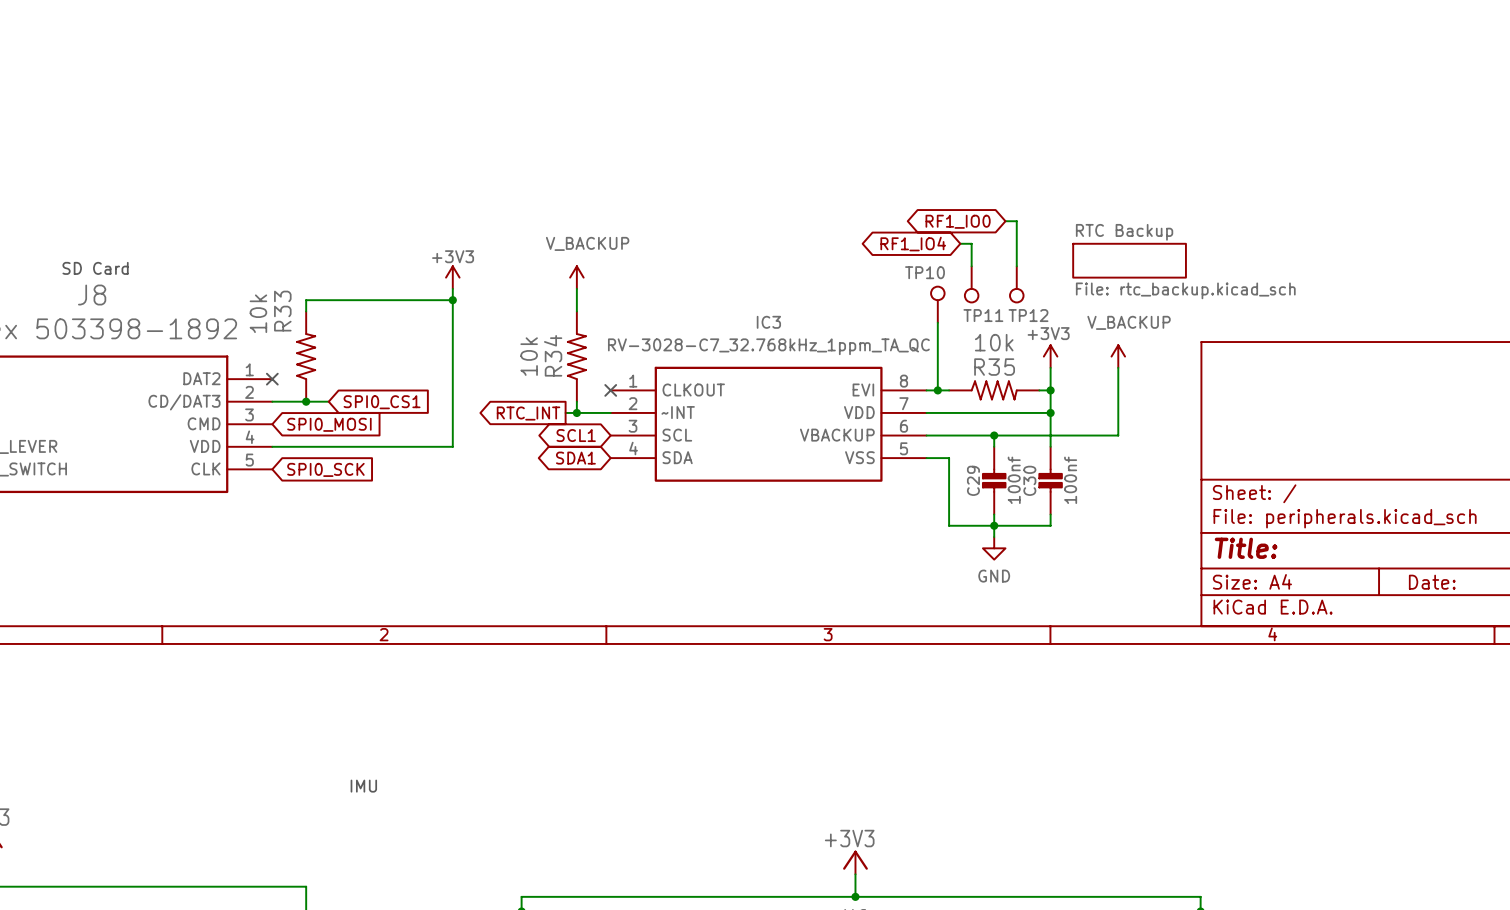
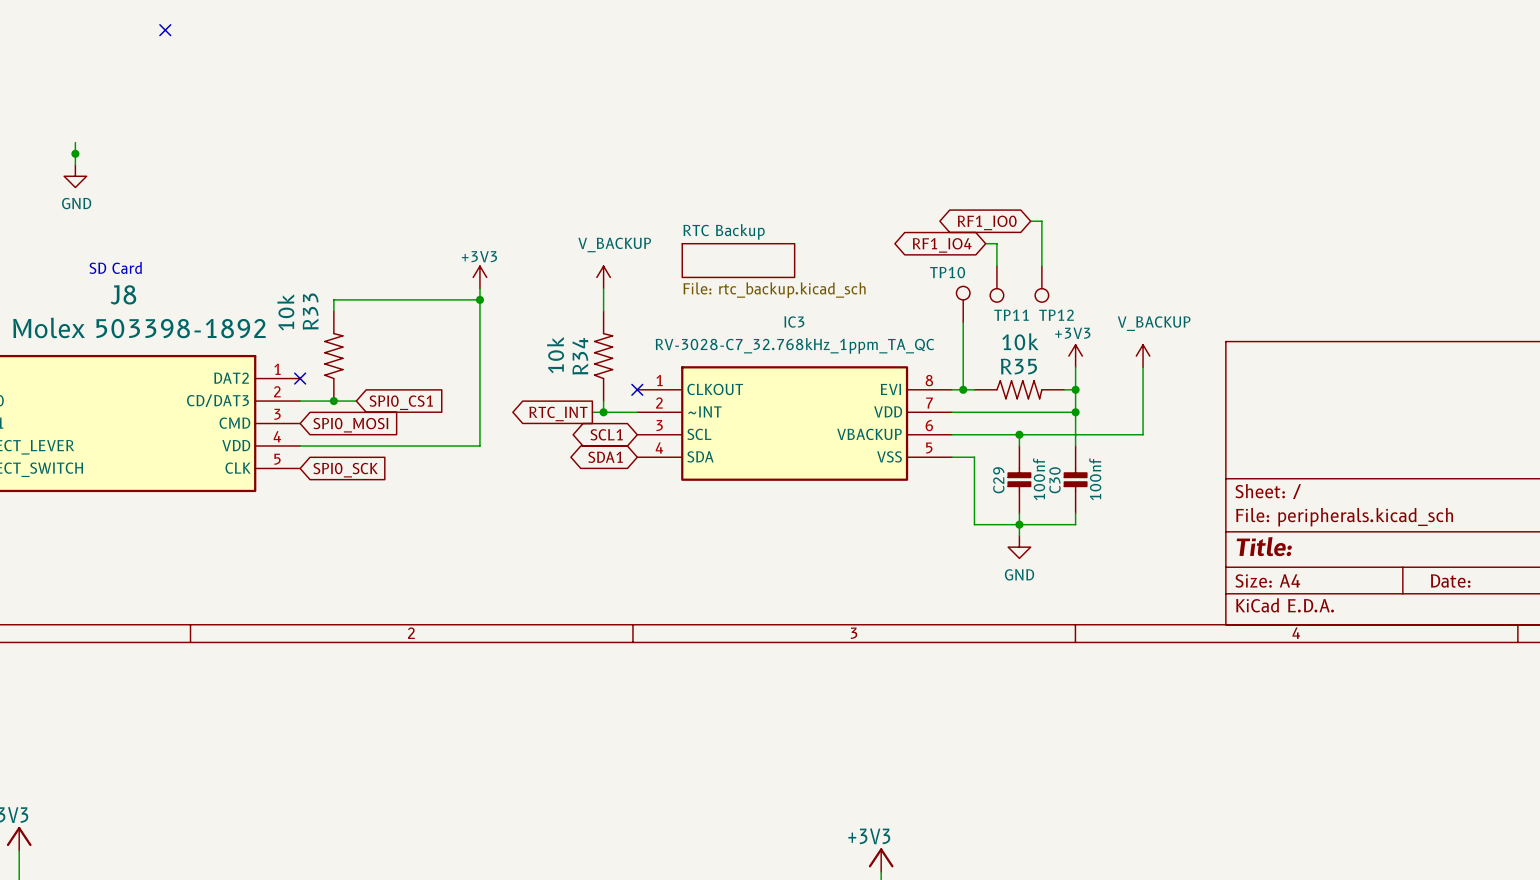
no-connect mark: none -> (165, 30)
wire: none -> (75, 142) (75, 165)
junction: none -> (75, 153)
power symbol: none -> GND (75, 176)
sheet RTC Backup: none -> File: rtc_backup.kicad_sch (738, 260)
sheet RTC Backup: File: rtc_backup.kicad_sch (1129, 260) -> none
text: IMU (363, 786) -> none

